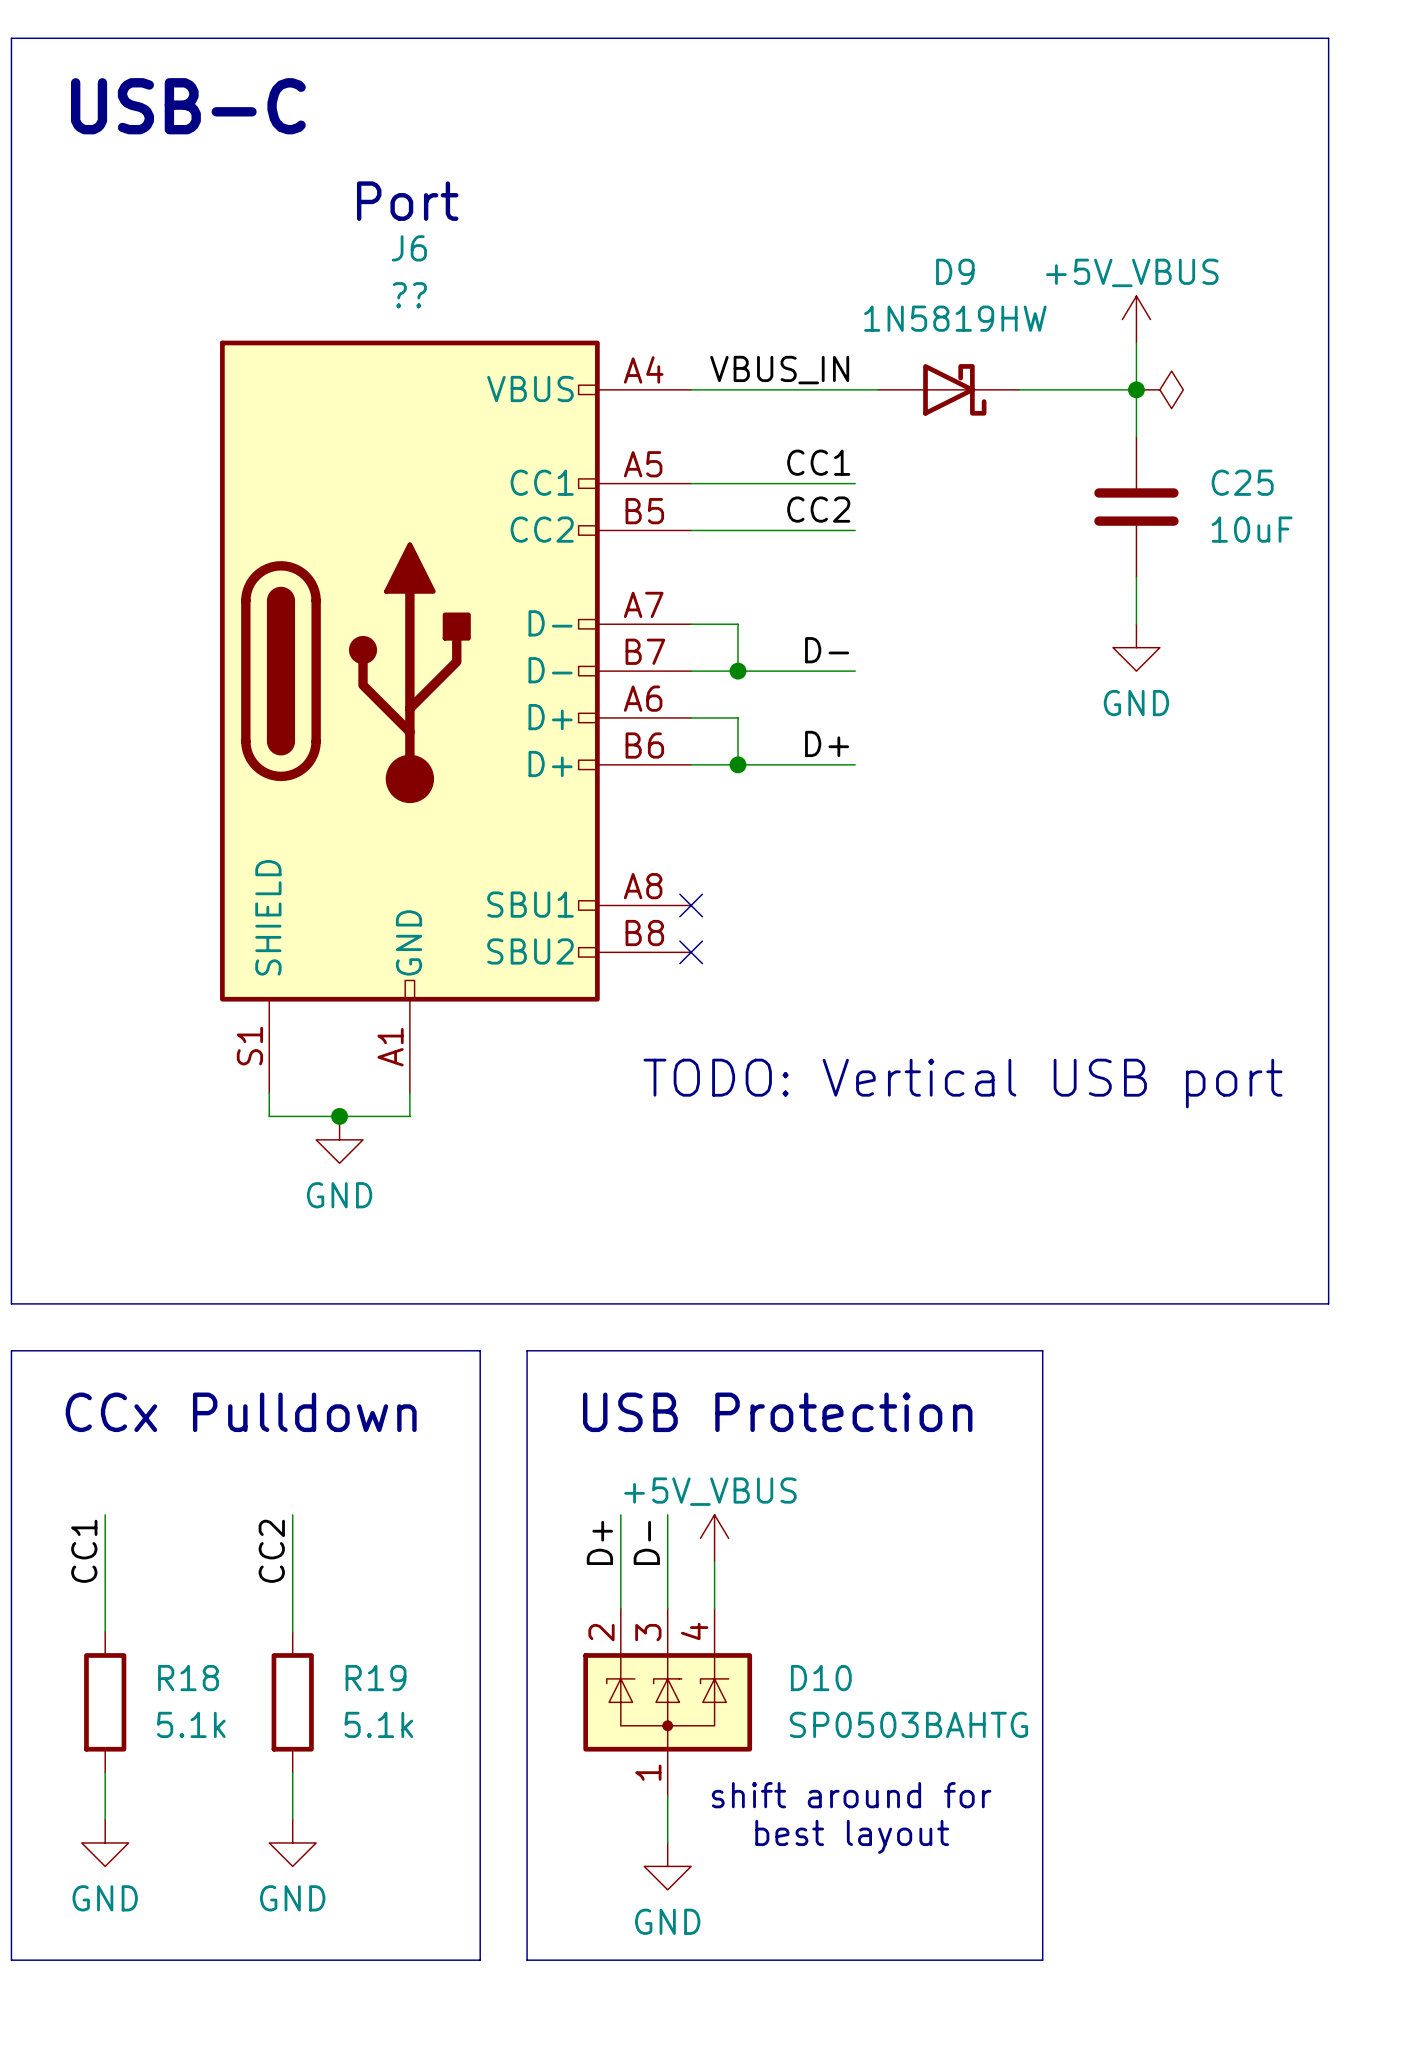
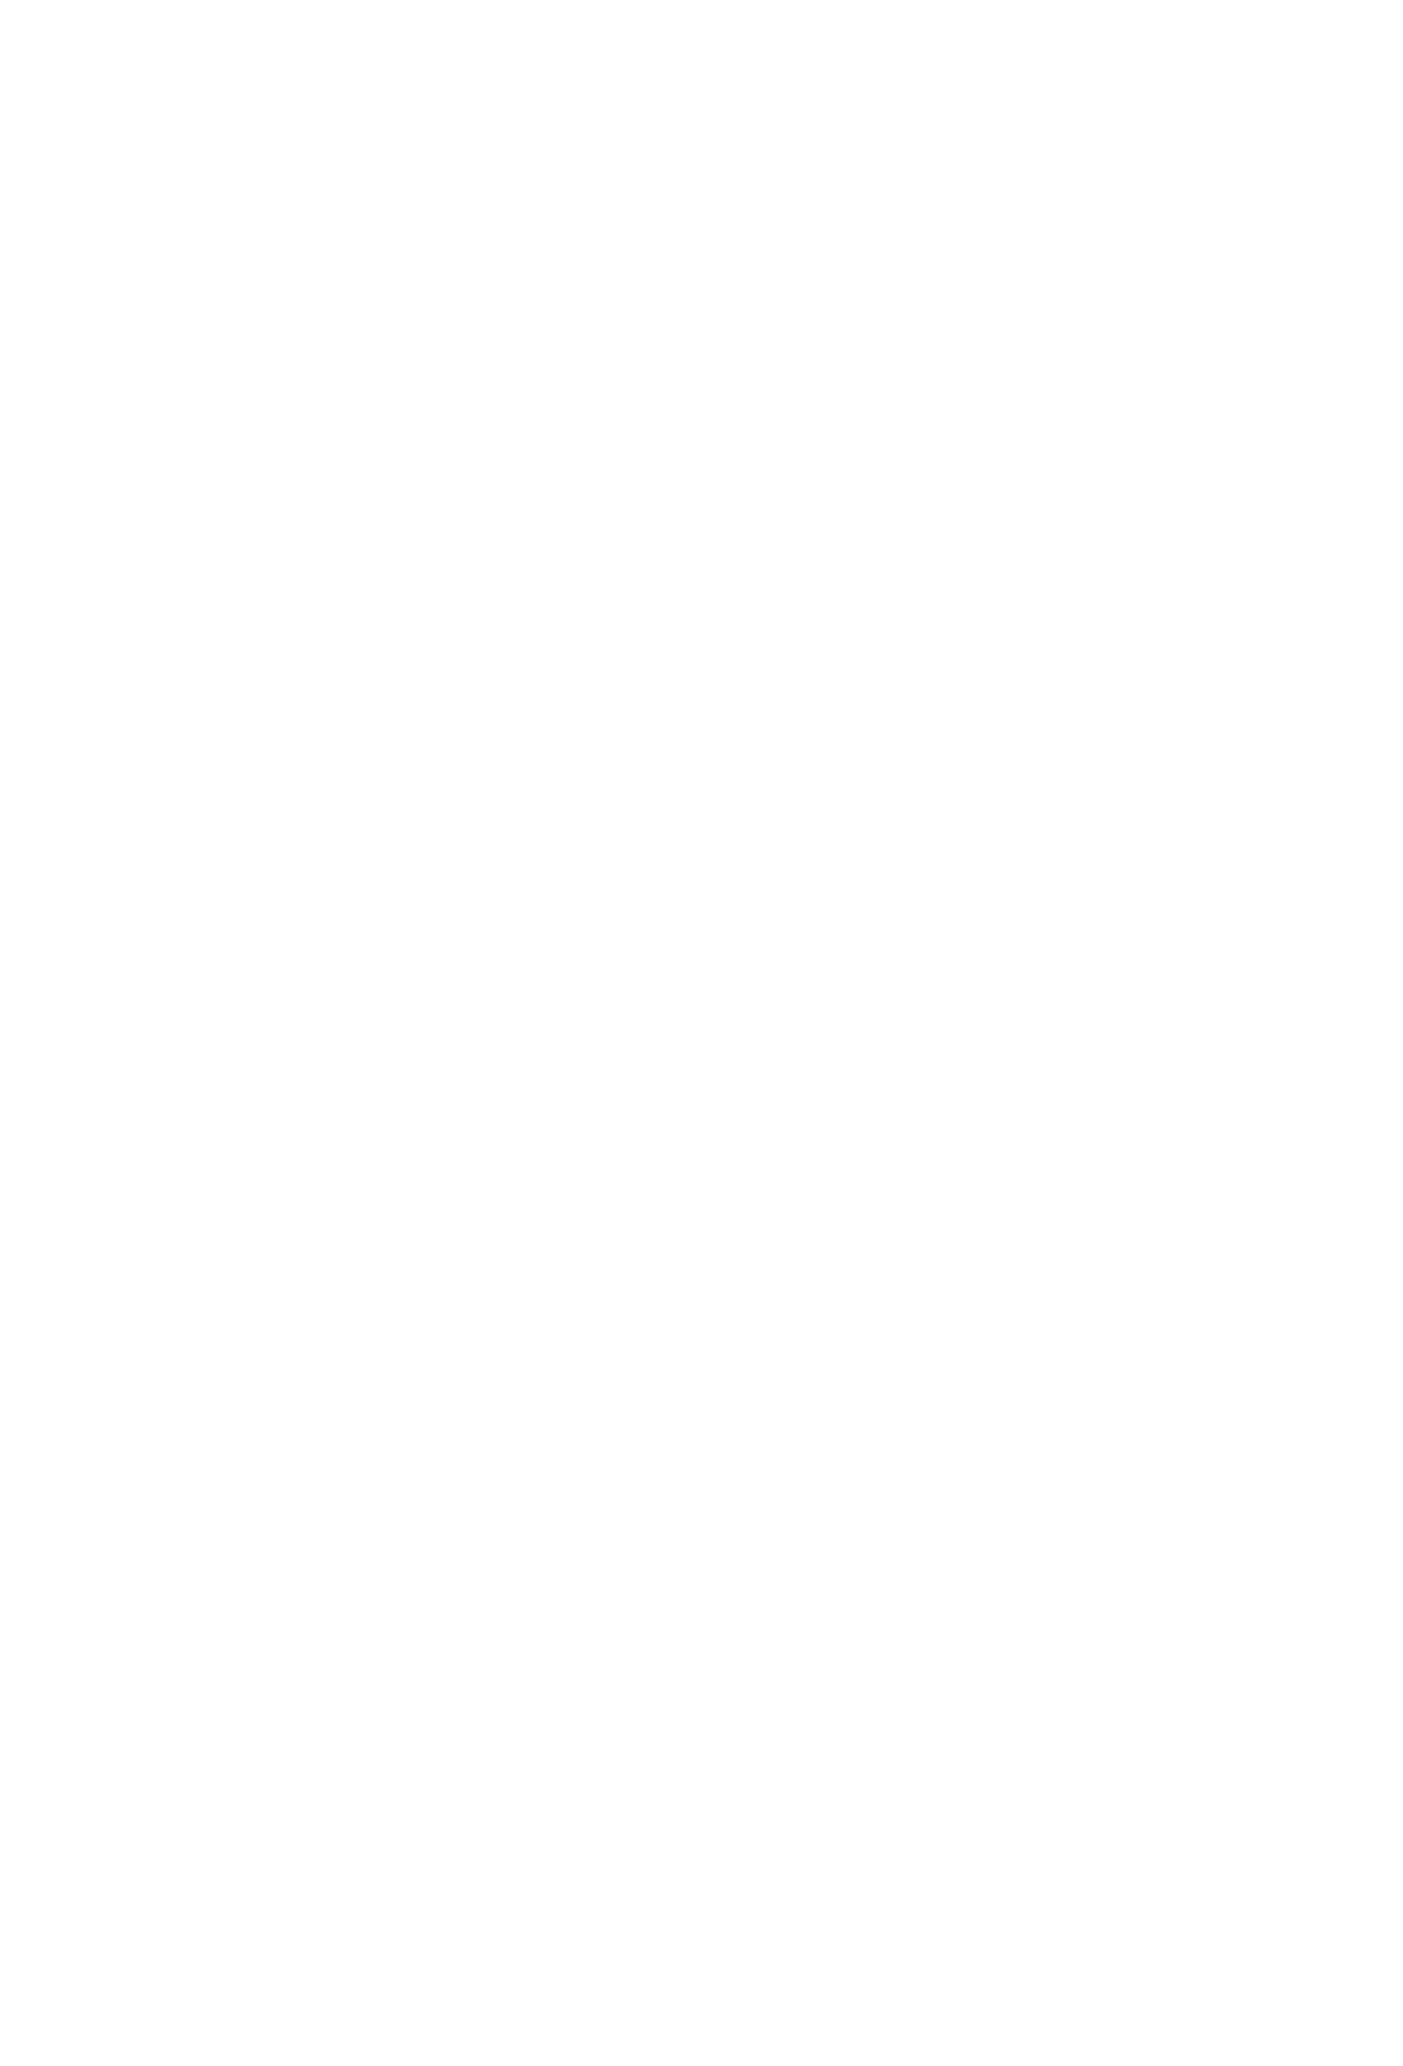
line: (11, 38) (1328, 38) (1328, 1303) (11, 1303) (11, 38) -> none
text: USB-C (188, 106) -> none
text: Port (407, 201) -> none
power symbol: +5V_VBUS (1136, 319) -> none
wire: (1136, 342) (1136, 436) -> none
label: VBUS_IN (779, 370) -> none
wire: (691, 389) (878, 389) -> none
D9: 1N5819HW (948, 389) -> none
wire: (1019, 389) (1136, 389) -> none
junction: (1136, 389) -> none
power symbol: (1159, 389) -> none
label: CC1 (818, 462) -> none
wire: (691, 483) (855, 483) -> none
C25: 10uF (1136, 507) -> none
label: CC2 (818, 509) -> none
wire: (691, 530) (855, 530) -> none
wire: (1136, 577) (1136, 624) -> none
wire: (691, 624) (738, 624) (738, 671) -> none
power symbol: GND (1136, 647) -> none
label: D- (827, 650) -> none
wire: (691, 671) (855, 671) -> none
junction: (738, 671) -> none
J6: ?? (455, 716) -> none
wire: (691, 717) (738, 717) (738, 764) -> none
label: D+ (827, 743) -> none
wire: (691, 764) (855, 764) -> none
junction: (738, 764) -> none
no-connect mark: (691, 905) -> none
no-connect mark: (691, 952) -> none
text: TODO: Vertical USB port (963, 1083) -> none
wire: (269, 1092) (269, 1116) (409, 1116) (409, 1092) -> none
junction: (339, 1116) -> none
power symbol: GND (339, 1139) -> none
line: (11, 1350) (480, 1350) (480, 1960) (11, 1960) (11, 1350) -> none
line: (527, 1350) (1042, 1350) (1042, 1960) (527, 1960) (527, 1350) -> none
text: CCx Pulldown (241, 1412) -> none
text: USB Protection (777, 1412) -> none
wire: (105, 1514) (105, 1632) -> none
wire: (292, 1514) (292, 1632) -> none
wire: (620, 1514) (620, 1608) -> none
wire: (667, 1514) (667, 1608) -> none
power symbol: +5V_VBUS (714, 1538) -> none
label: D+ (599, 1542) -> none
label: D- (646, 1542) -> none
label: CC1 (84, 1551) -> none
label: CC2 (271, 1551) -> none
wire: (714, 1561) (714, 1608) -> none
R18: 5.1k (105, 1702) -> none
R19: 5.1k (292, 1702) -> none
D10: SP0503BAHTG (667, 1702) -> none
wire: (105, 1772) (105, 1819) -> none
wire: (292, 1772) (292, 1819) -> none
text: shift around for (851, 1795) -> none
wire: (667, 1796) (667, 1842) -> none
text: best layout (852, 1836) -> none
power symbol: GND (105, 1842) -> none
power symbol: GND (292, 1842) -> none
power symbol: GND (667, 1866) -> none

